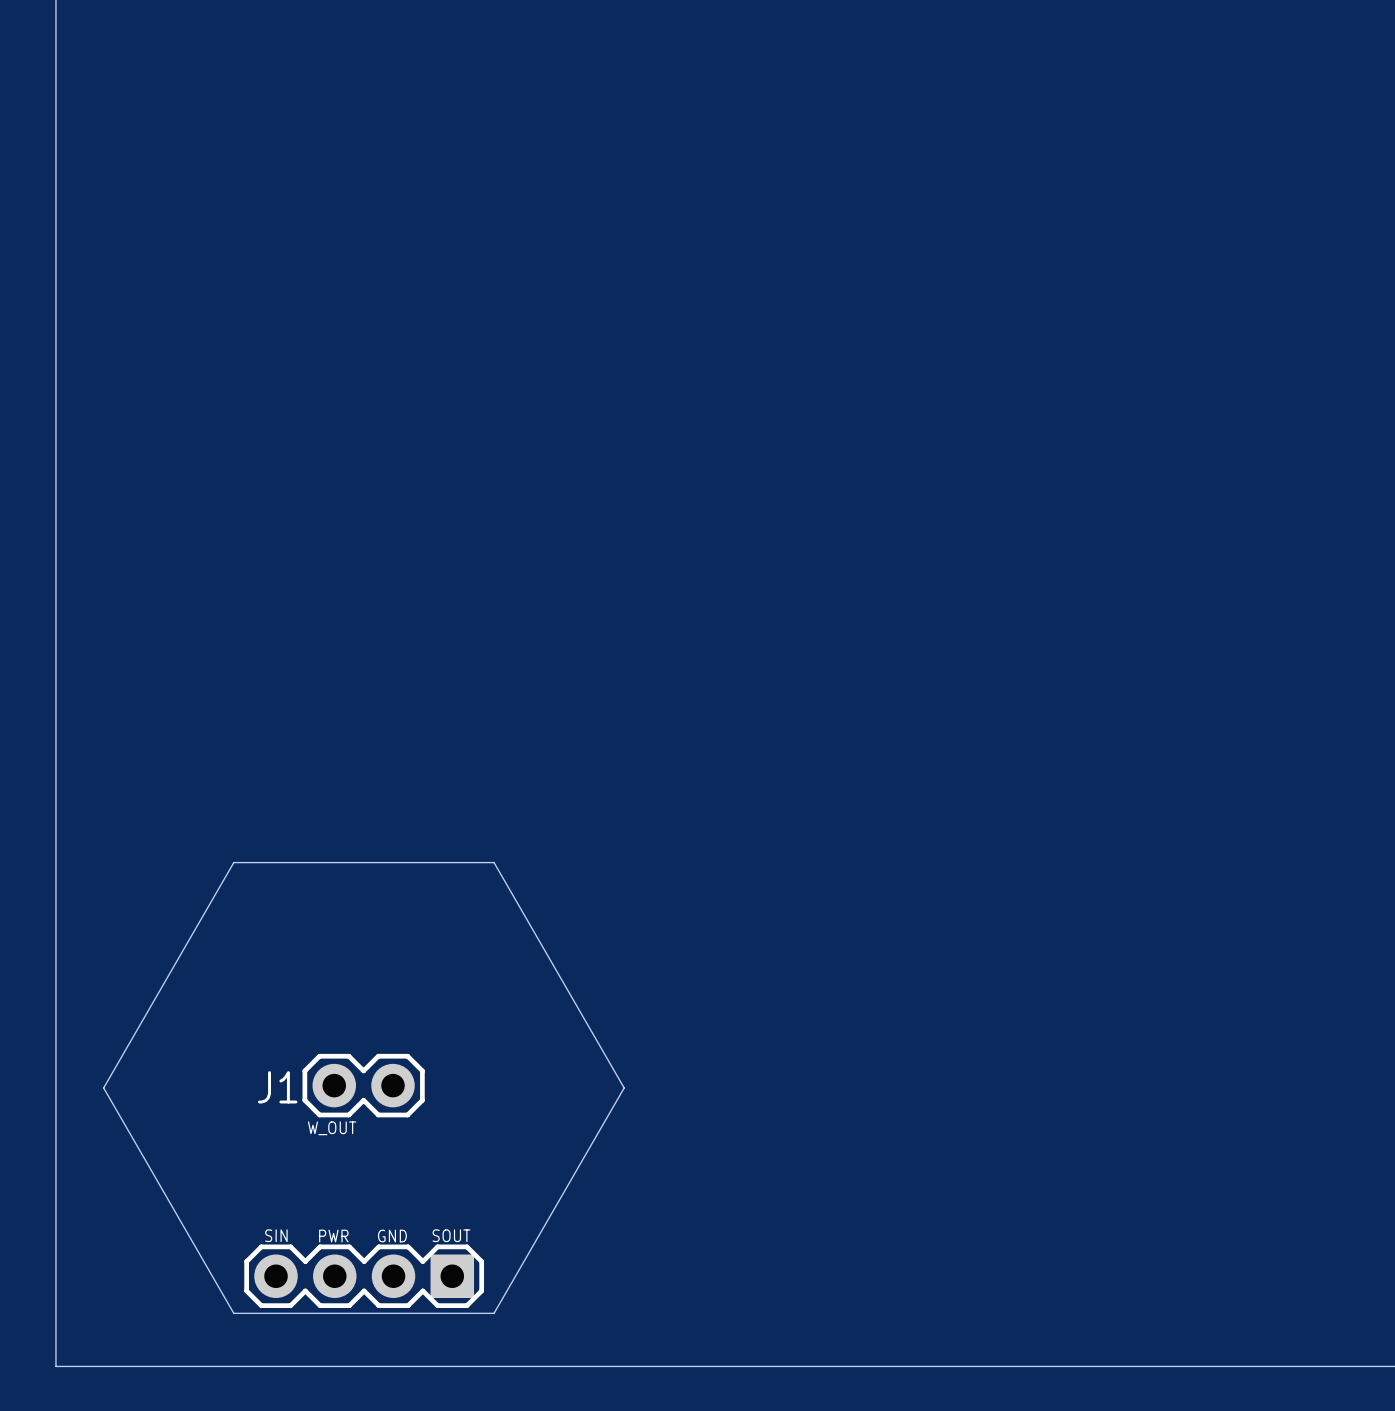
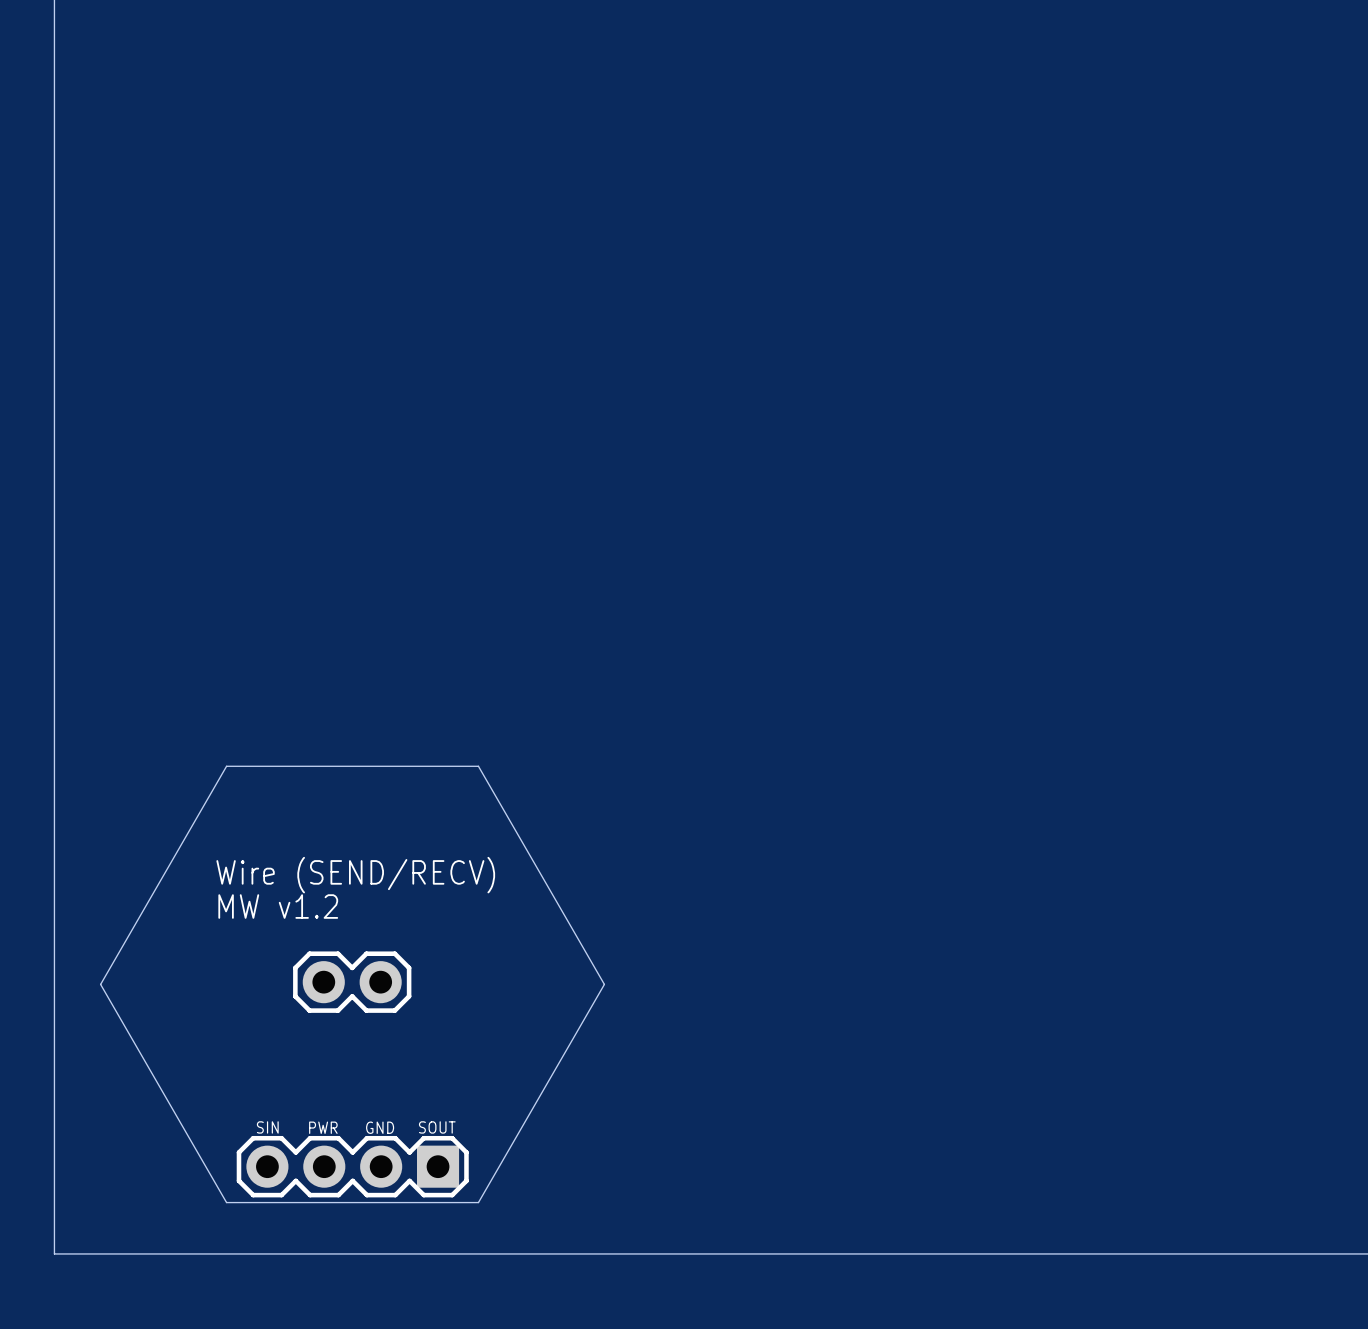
text: none -> Wire (SEND/RECV) (355, 875)
text: none -> MW v1.2 (278, 906)
J1 name: J1 (277, 1087) -> none
text: W_OUT (332, 1128) -> none

